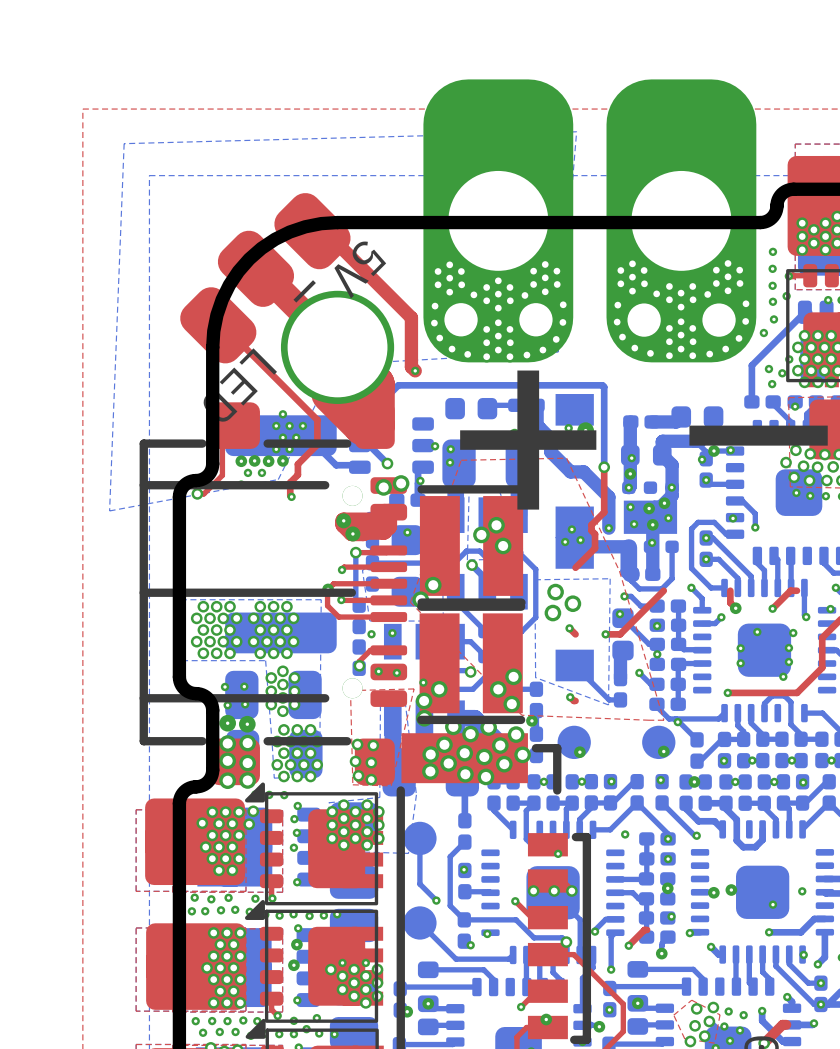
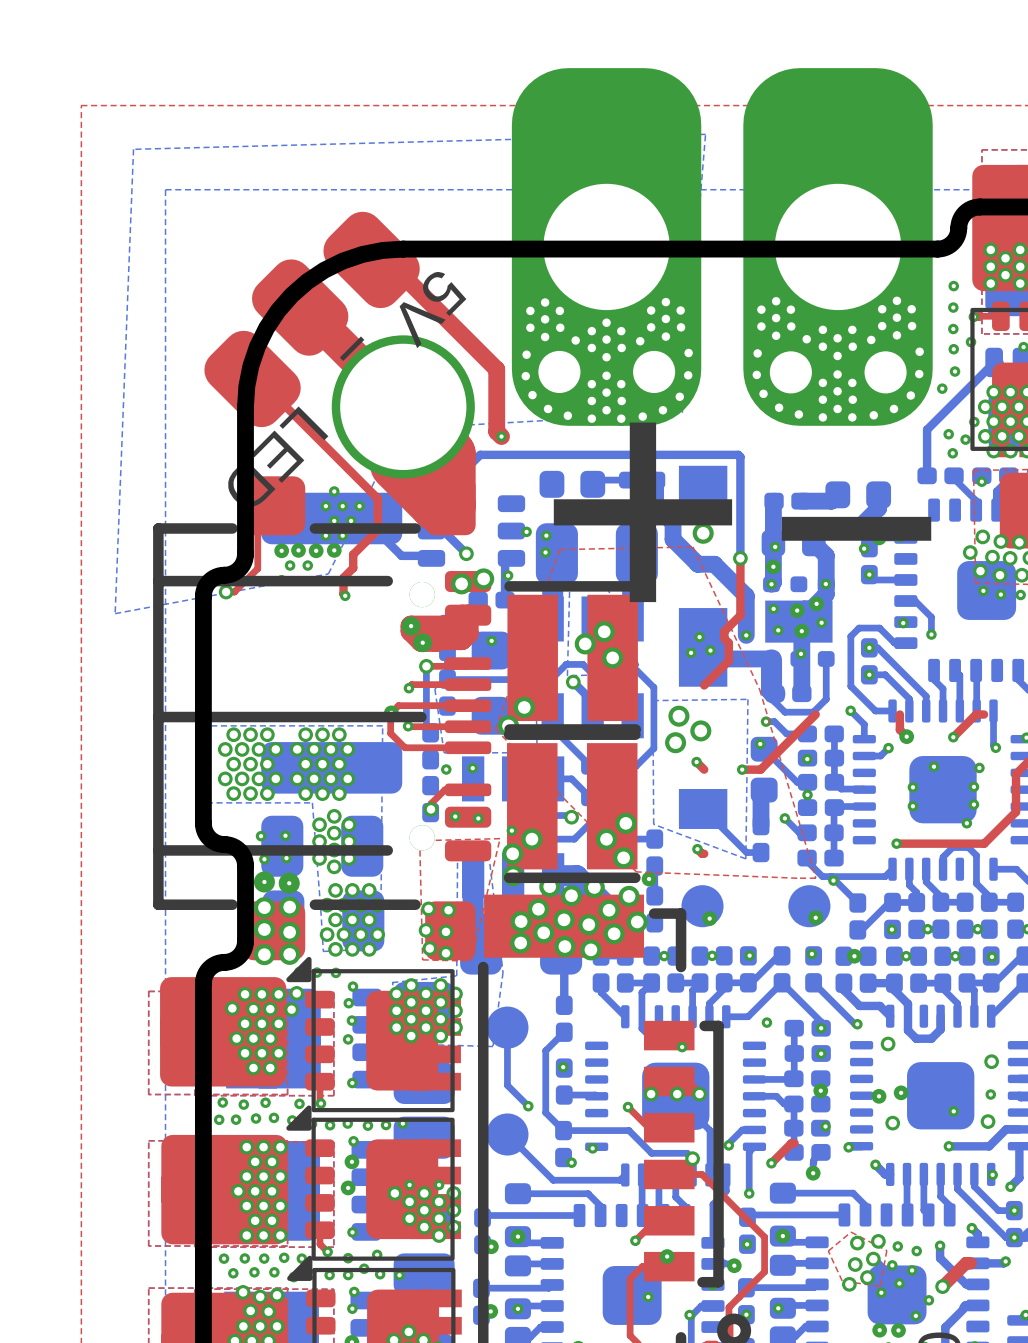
via: none -> (703, 533)
via: none -> (888, 1044)
via: none -> (991, 1061)
via: none -> (988, 1121)
via: none -> (892, 1123)

